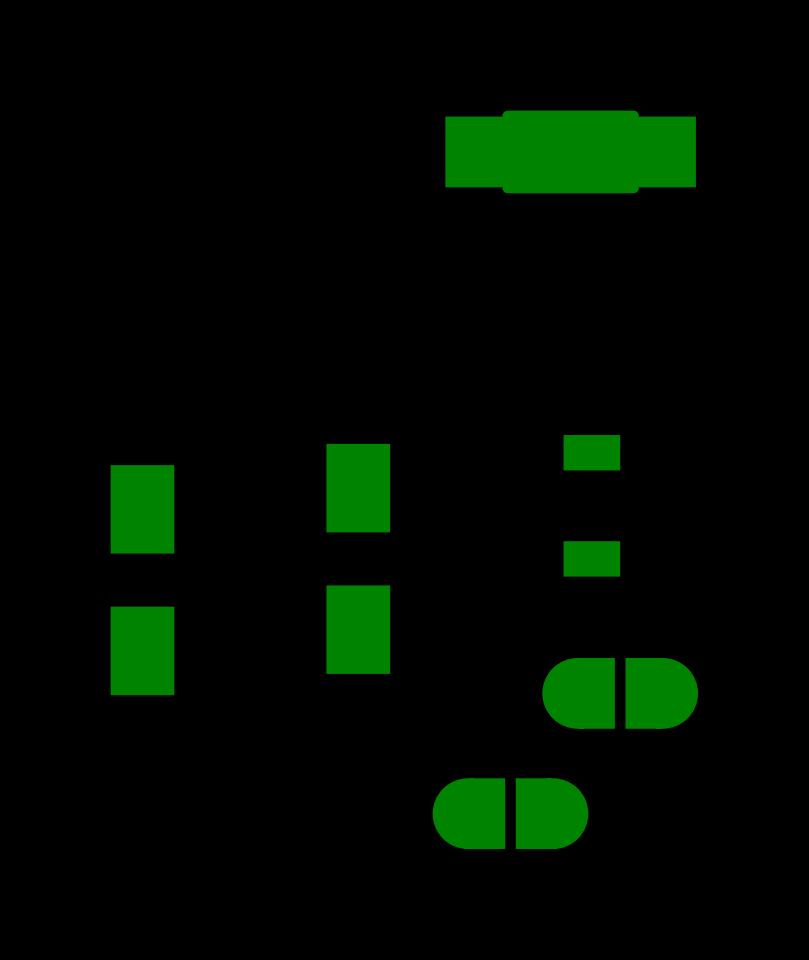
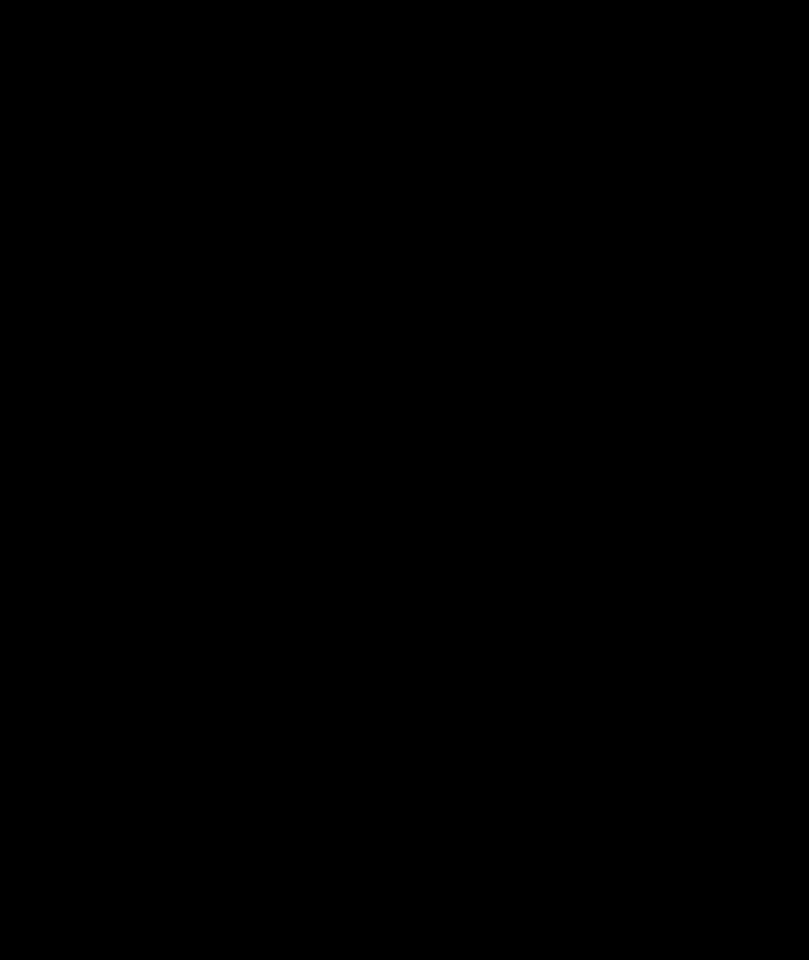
part: (570, 151) -> none
part: (591, 505) -> none
part: (358, 558) -> none
part: (142, 580) -> none
part: (620, 693) -> none
part: (510, 813) -> none

